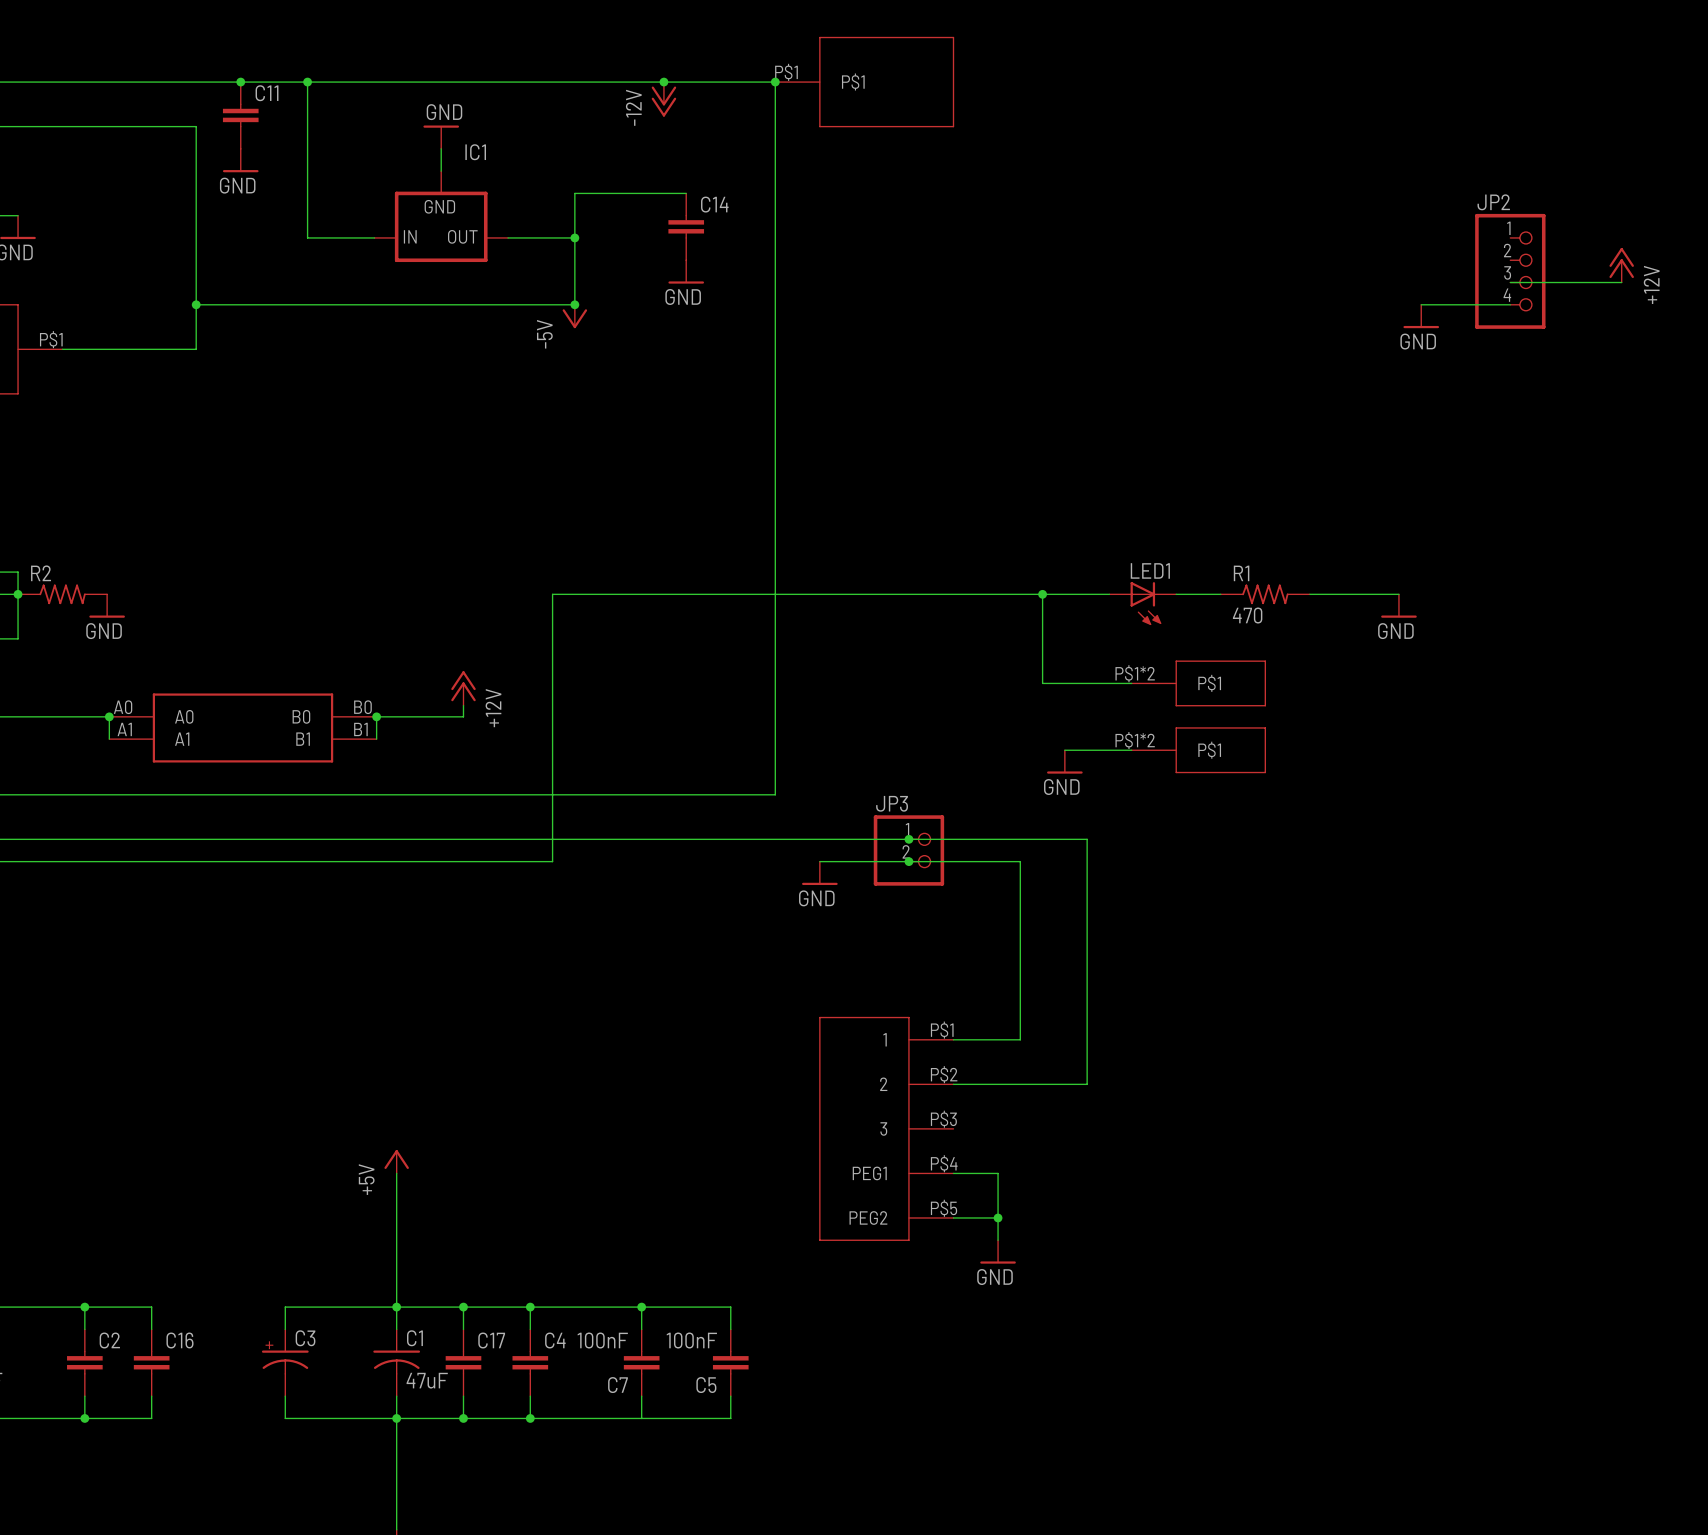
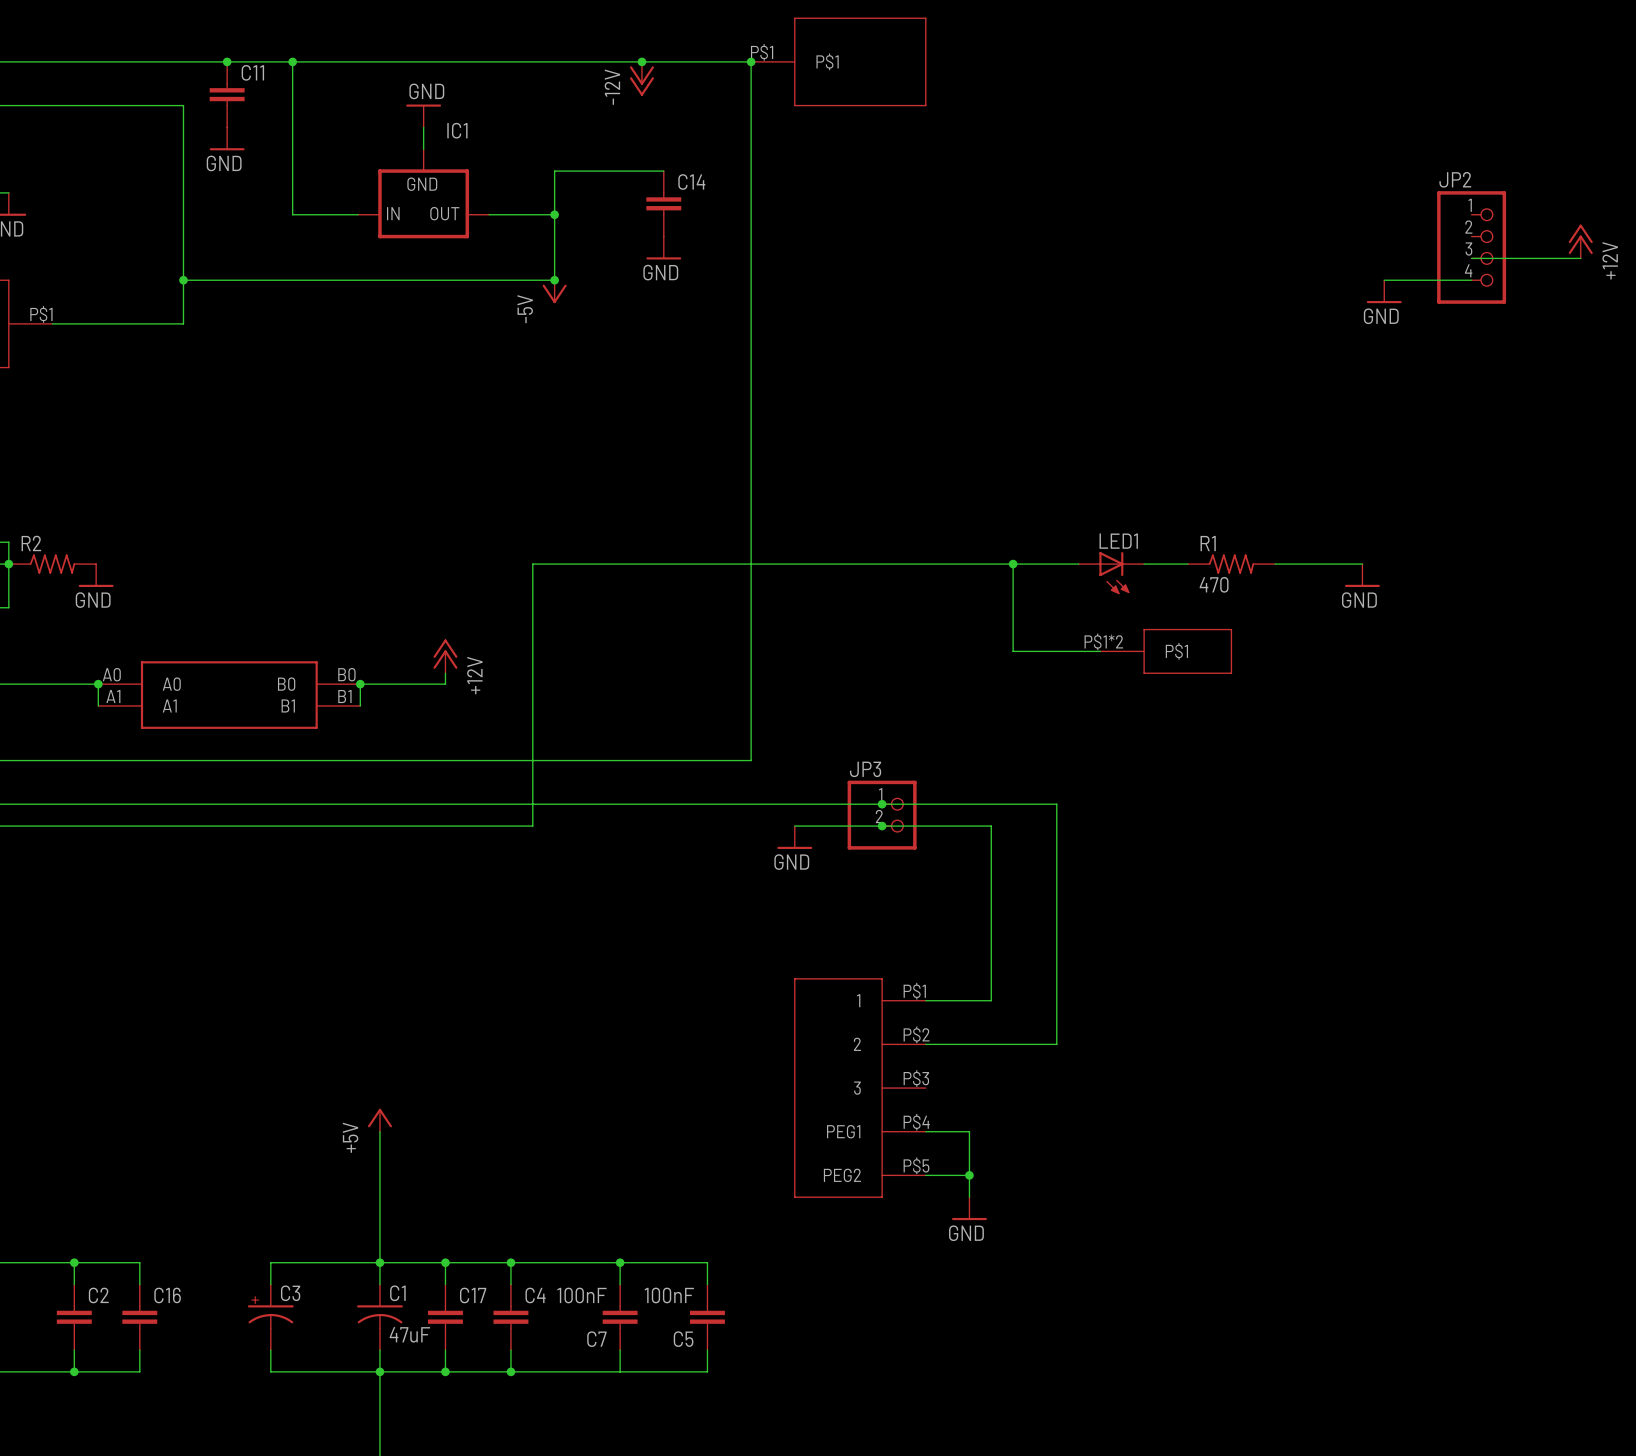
wire: (1064, 750) (1131, 750) -> none
part: (1198, 750) -> none
power symbol: GND (1064, 761) -> none

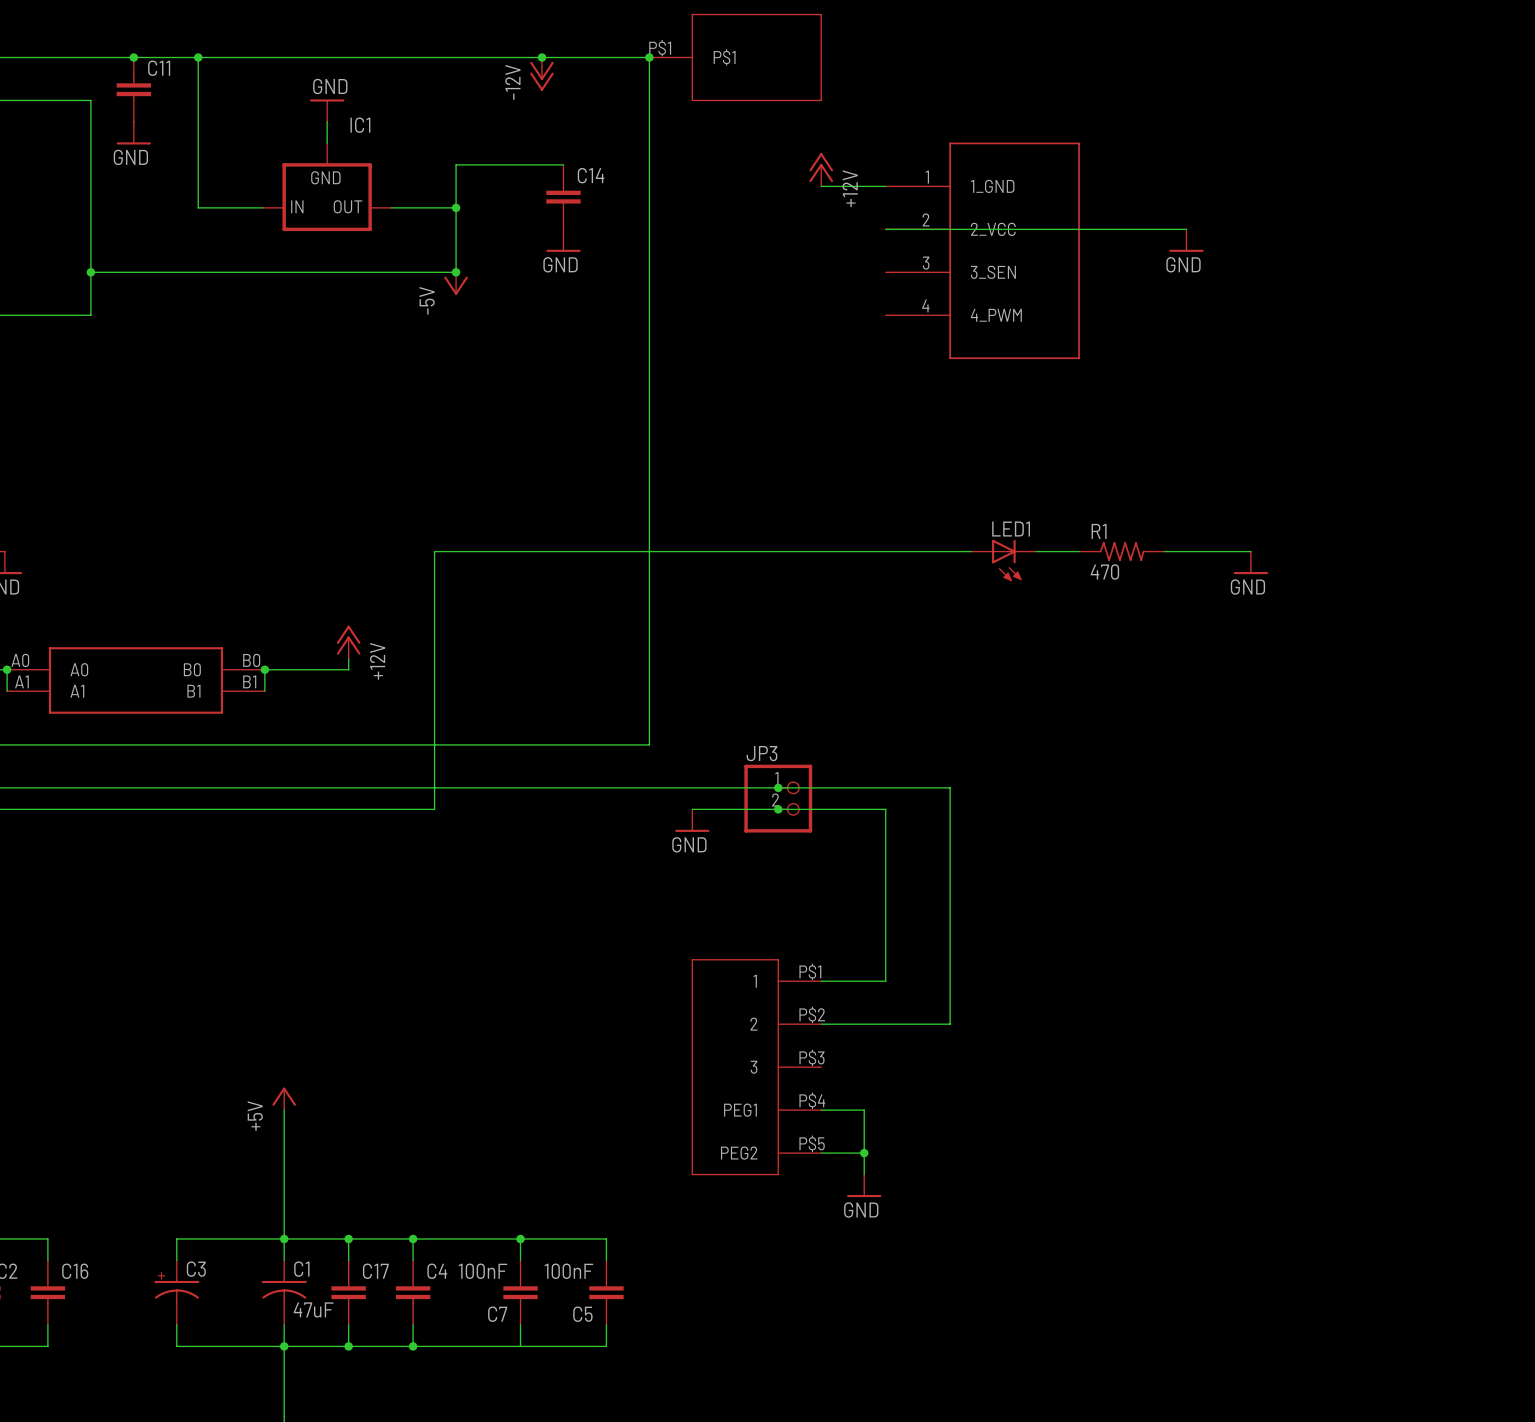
power symbol: none -> +12V (821, 169)
wire: none -> (821, 186) (885, 186)
wire: none -> (885, 229) (1186, 229)
power symbol: +12V (1580, 241) -> none
JP2: (1471, 247) -> none
part: none -> (982, 250)
wire: (1471, 258) (1580, 258) -> none
wire: (1384, 280) (1471, 280) -> none
power symbol position: GND (1384, 291) -> GND (1186, 240)
wire: (1013, 564) (1013, 651) (1100, 651) -> none
junction: (1013, 564) -> none
part: (1166, 651) -> none

